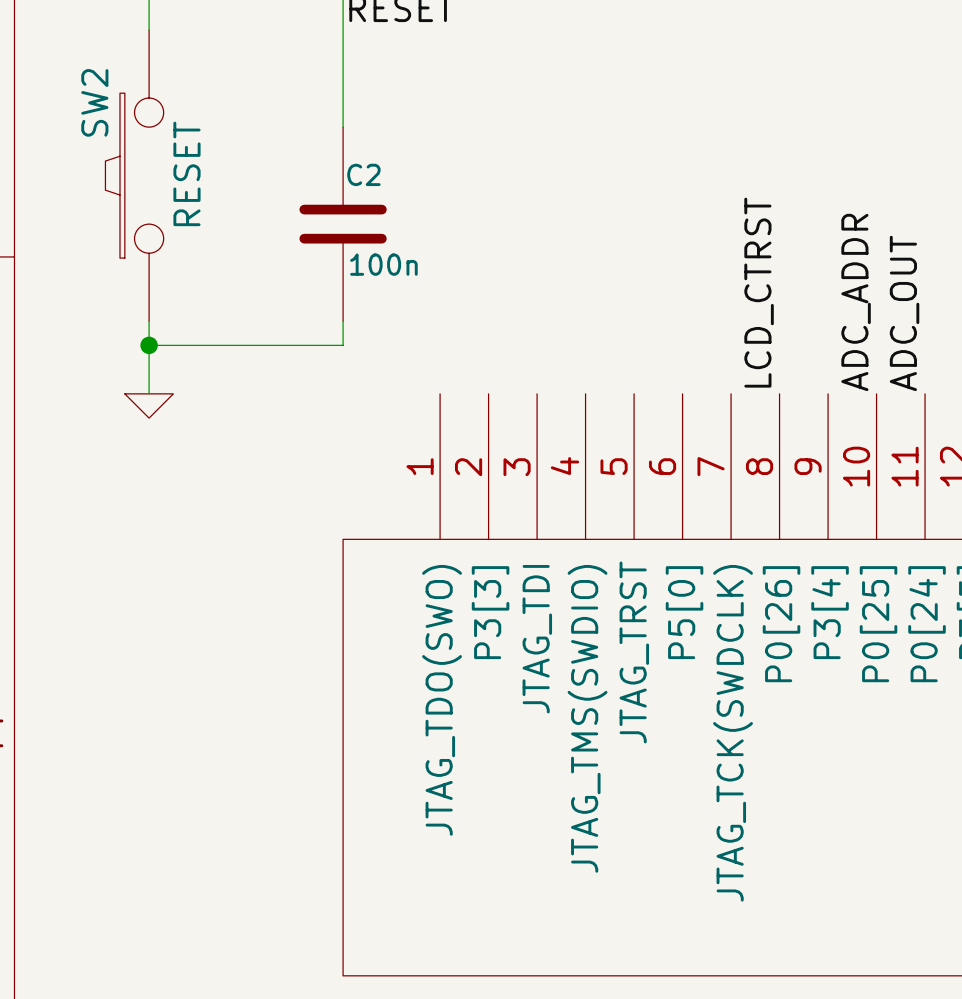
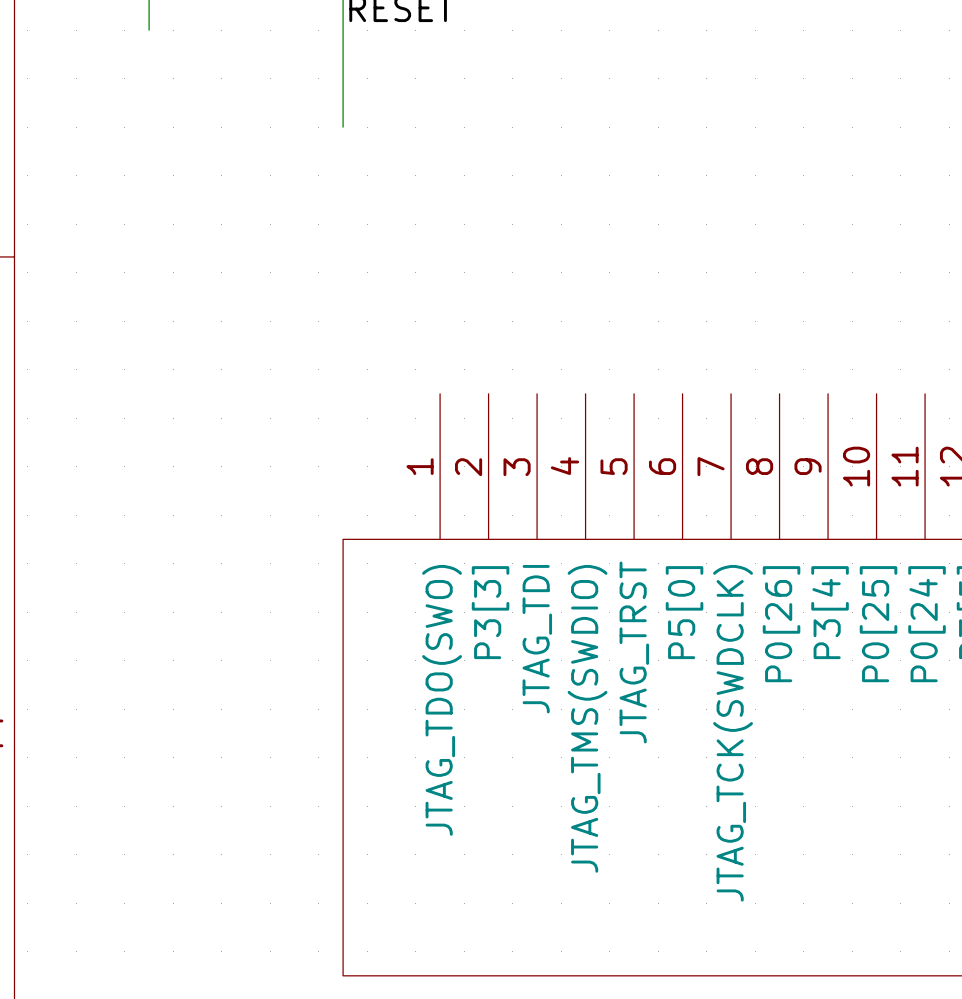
SW2: RESET (134, 175) -> none
C2: 100n (343, 224) -> none
label: LCD_CTRST (759, 292) -> none
label: ADC_ADDR (856, 302) -> none
label: ADC_OUT (904, 313) -> none
wire: (149, 321) (149, 393) -> none
wire: (343, 321) (343, 345) (149, 345) -> none
junction: (149, 345) -> none
power symbol: (149, 405) -> none

